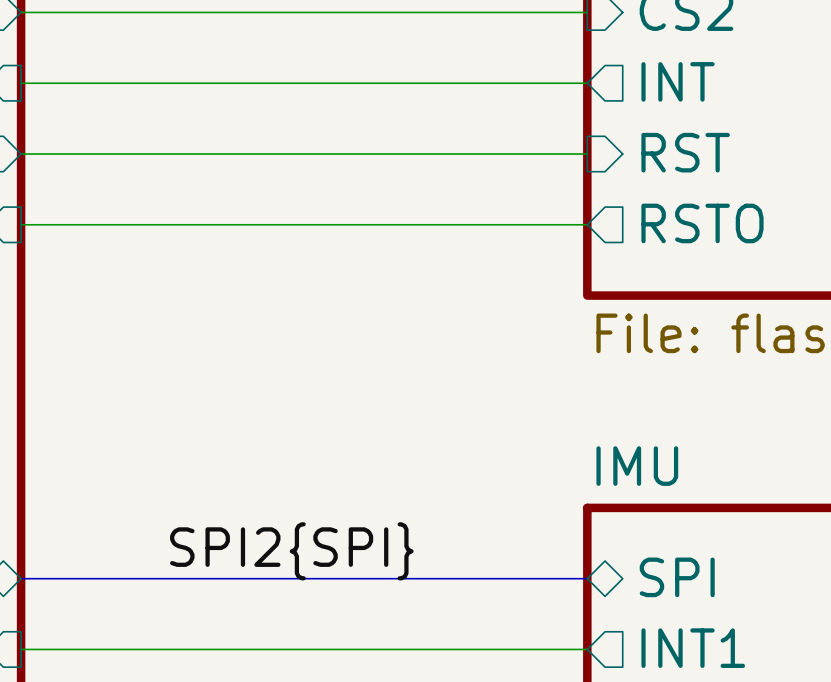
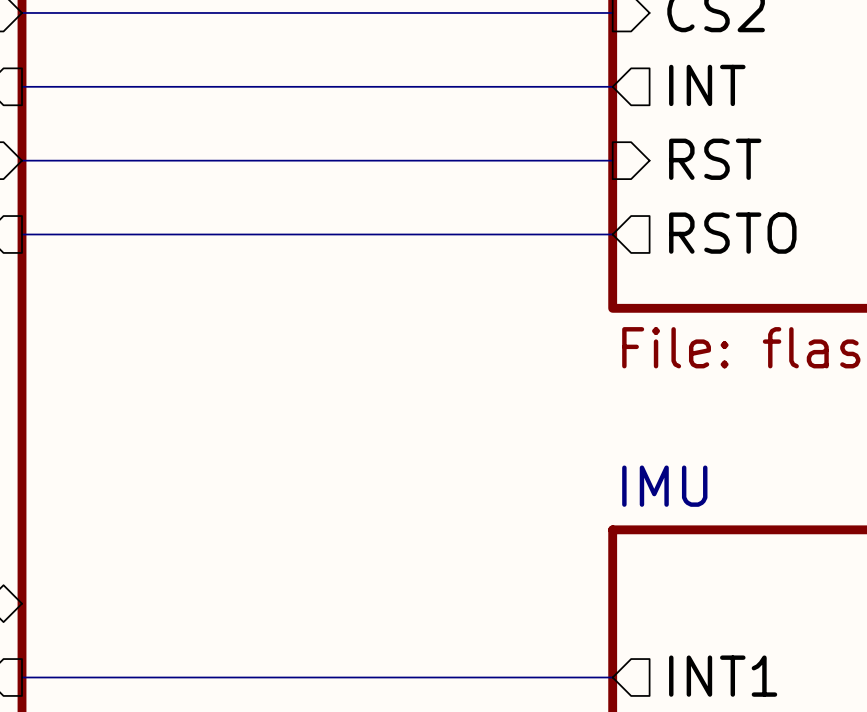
label: SPI2{SPI} (291, 551) -> none
sheet pin: SPI (677, 577) -> none
bus: (21, 578) (587, 578) -> none

